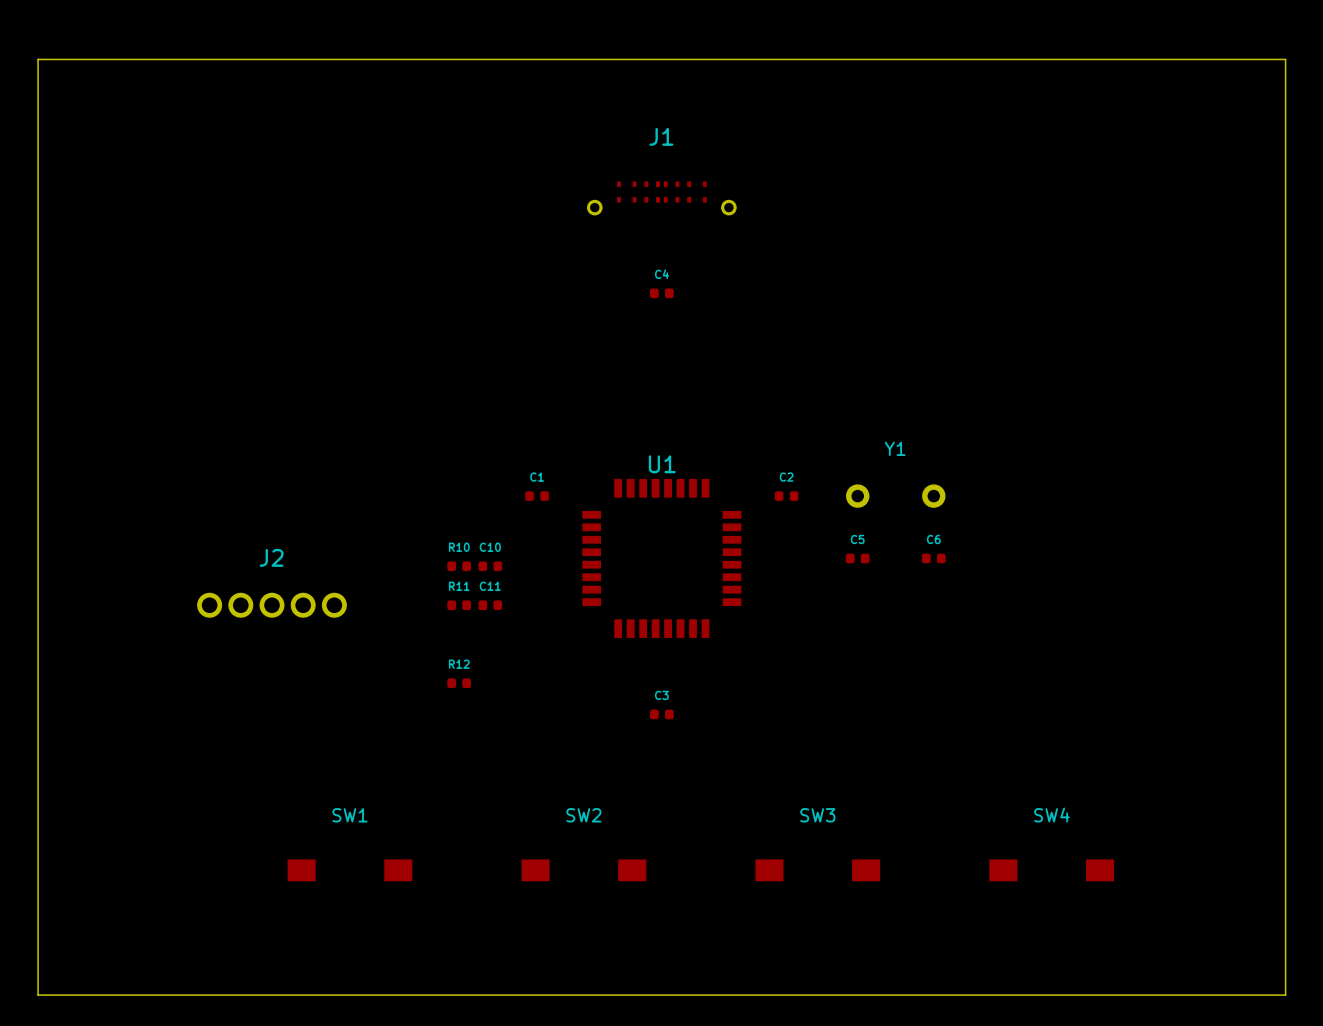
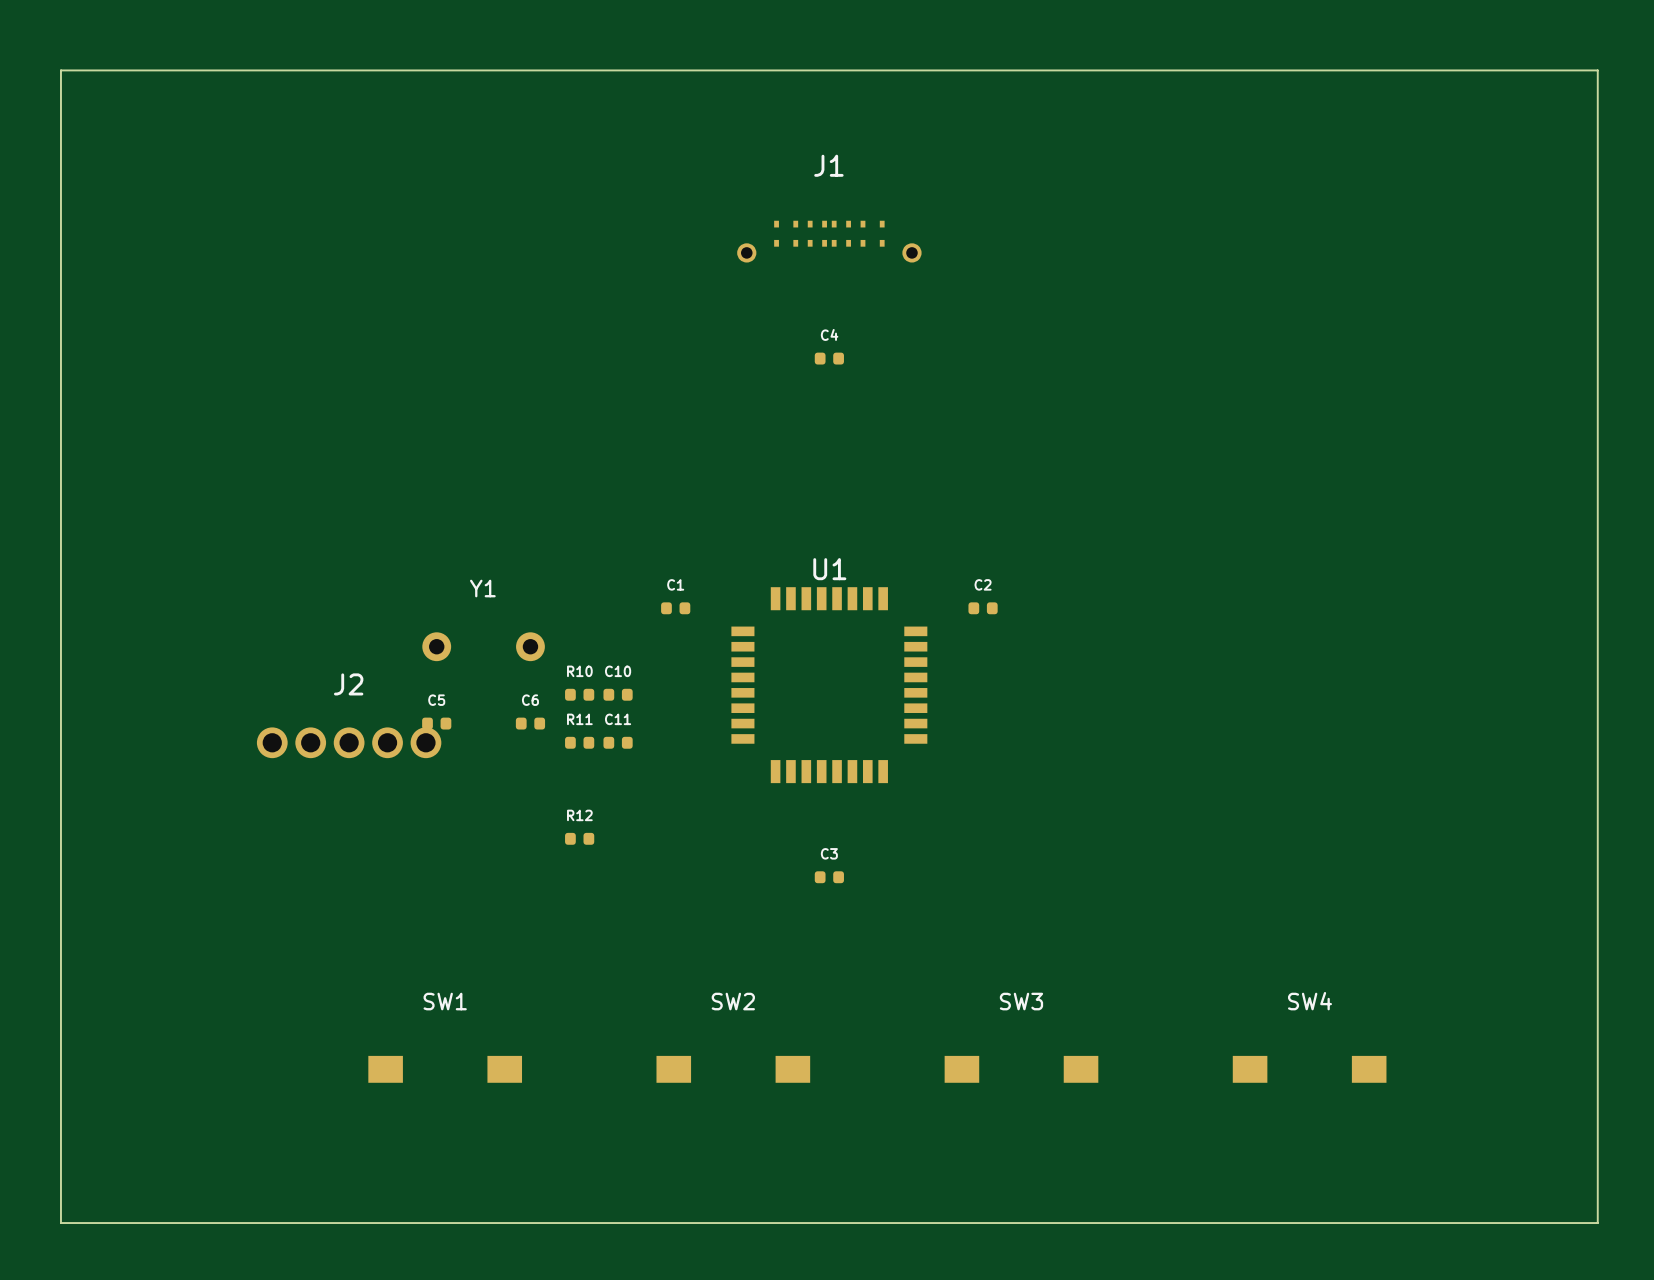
Y1 position: (895, 496) -> (483, 646)
C5 position: (857, 558) -> (436, 723)
C6 position: (933, 558) -> (530, 723)

